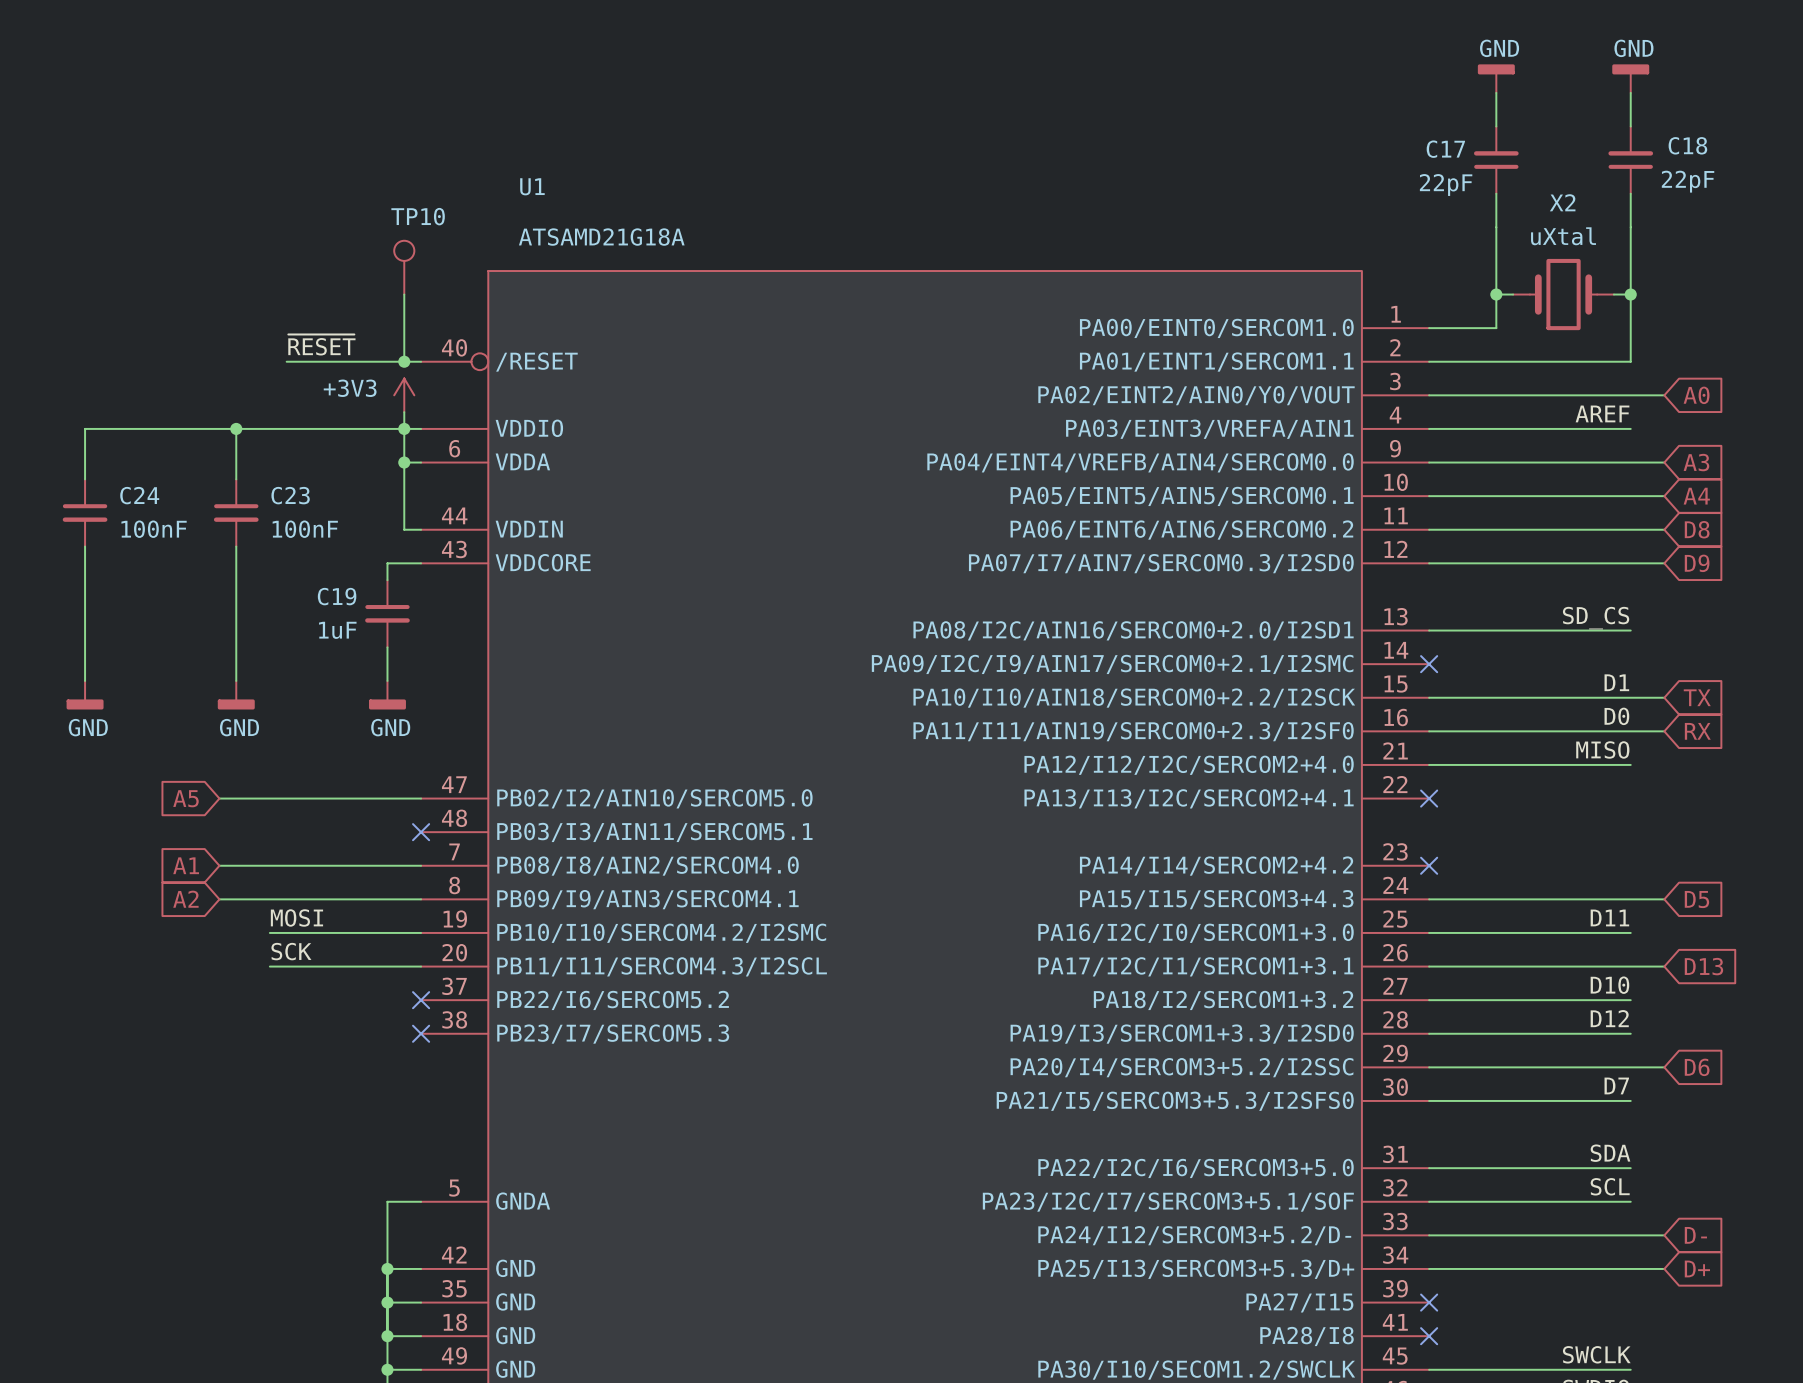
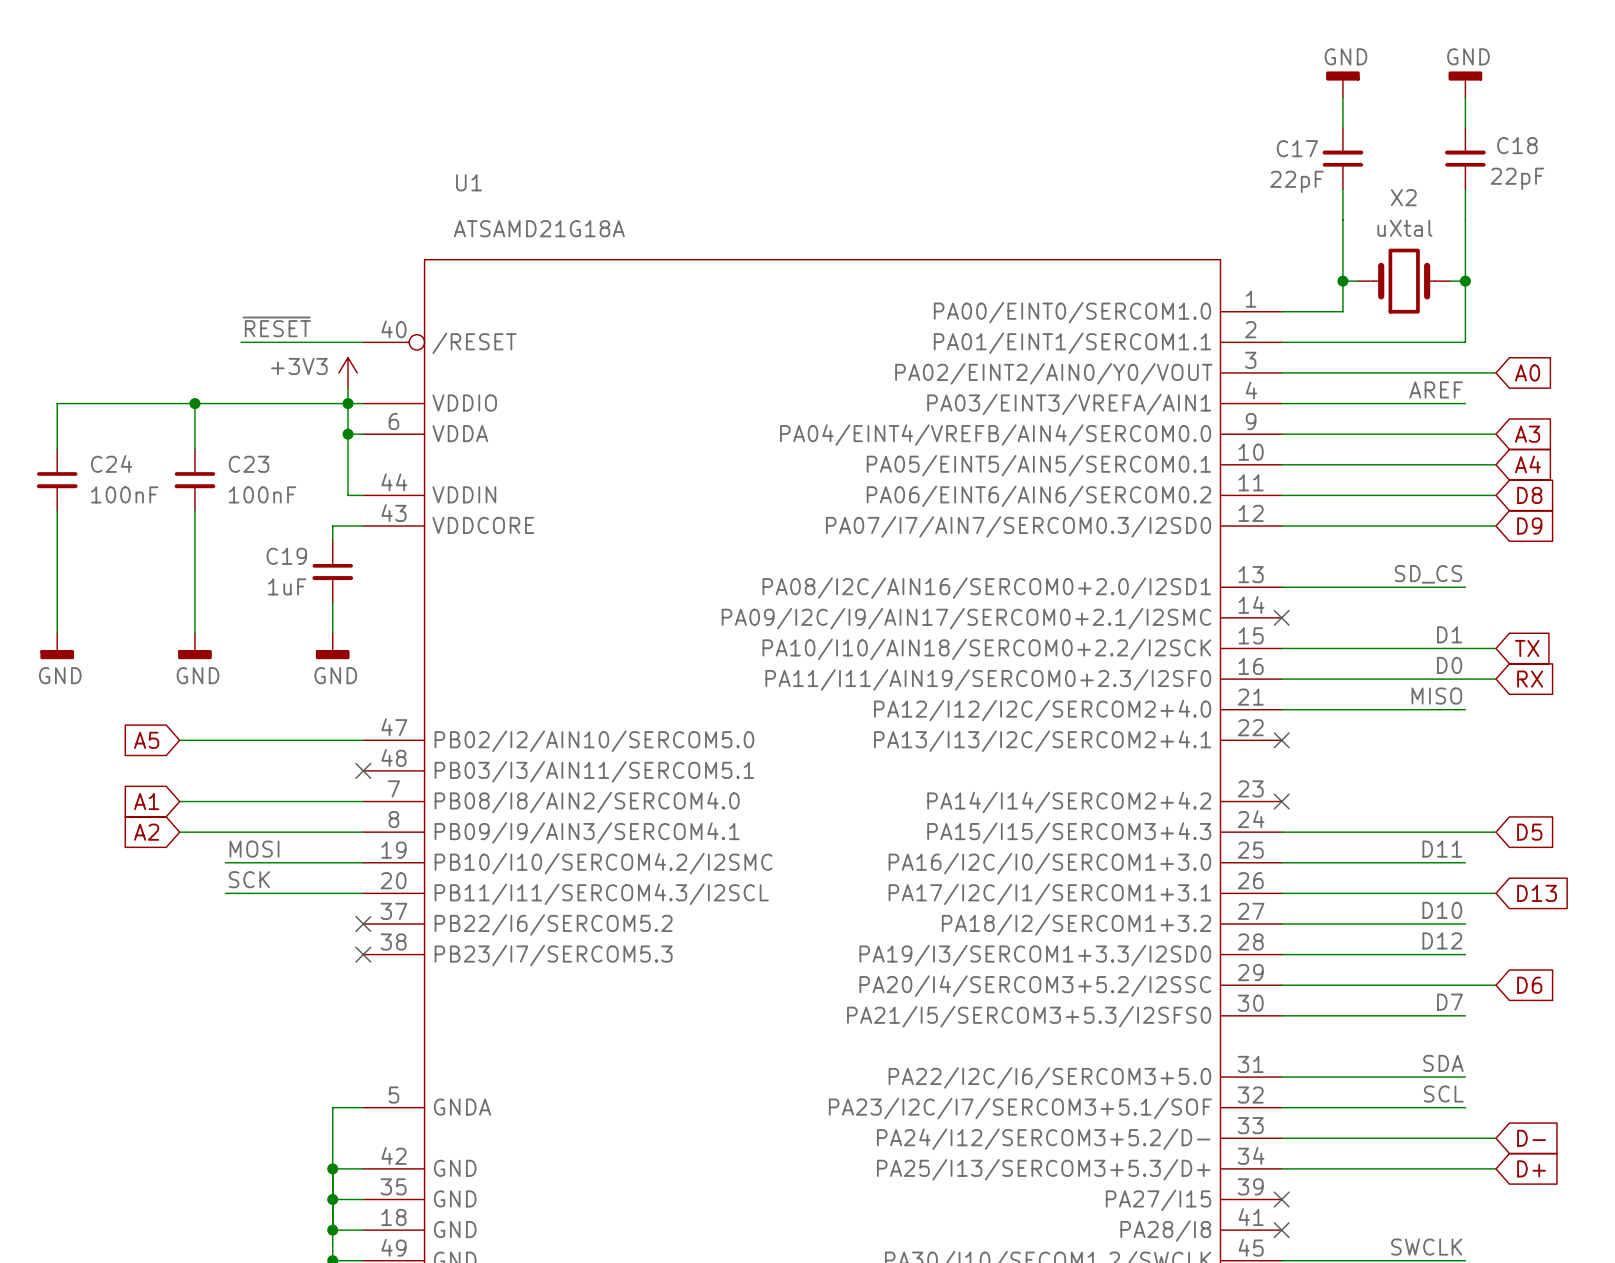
TP10: (404, 267) -> none
wire: (404, 294) (404, 361) -> none
junction: (404, 361) -> none

